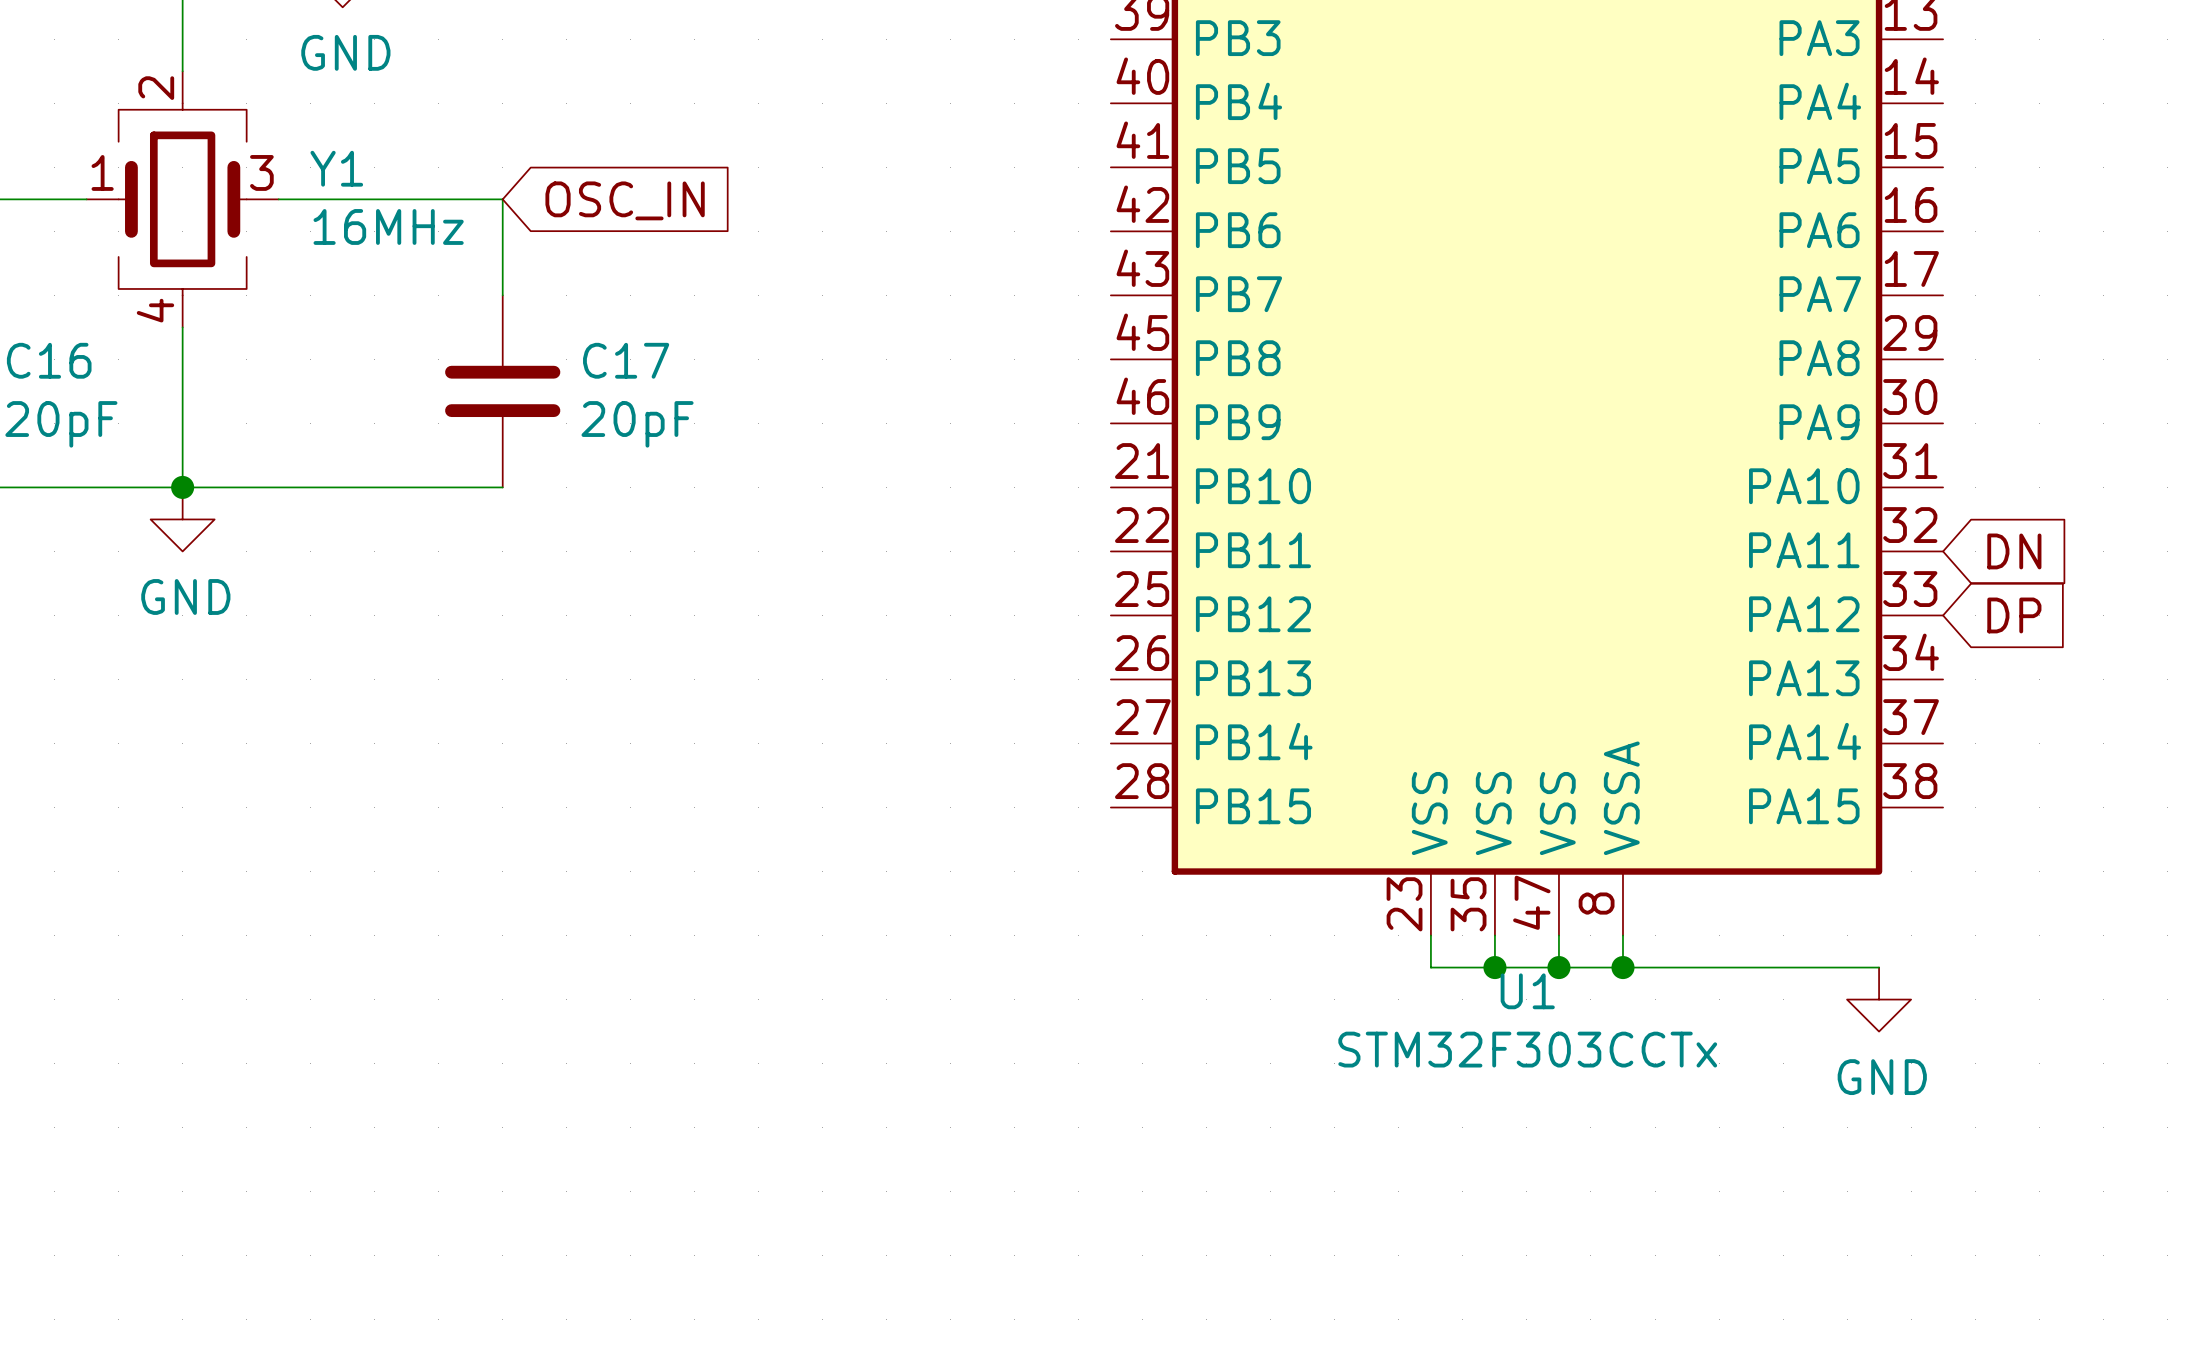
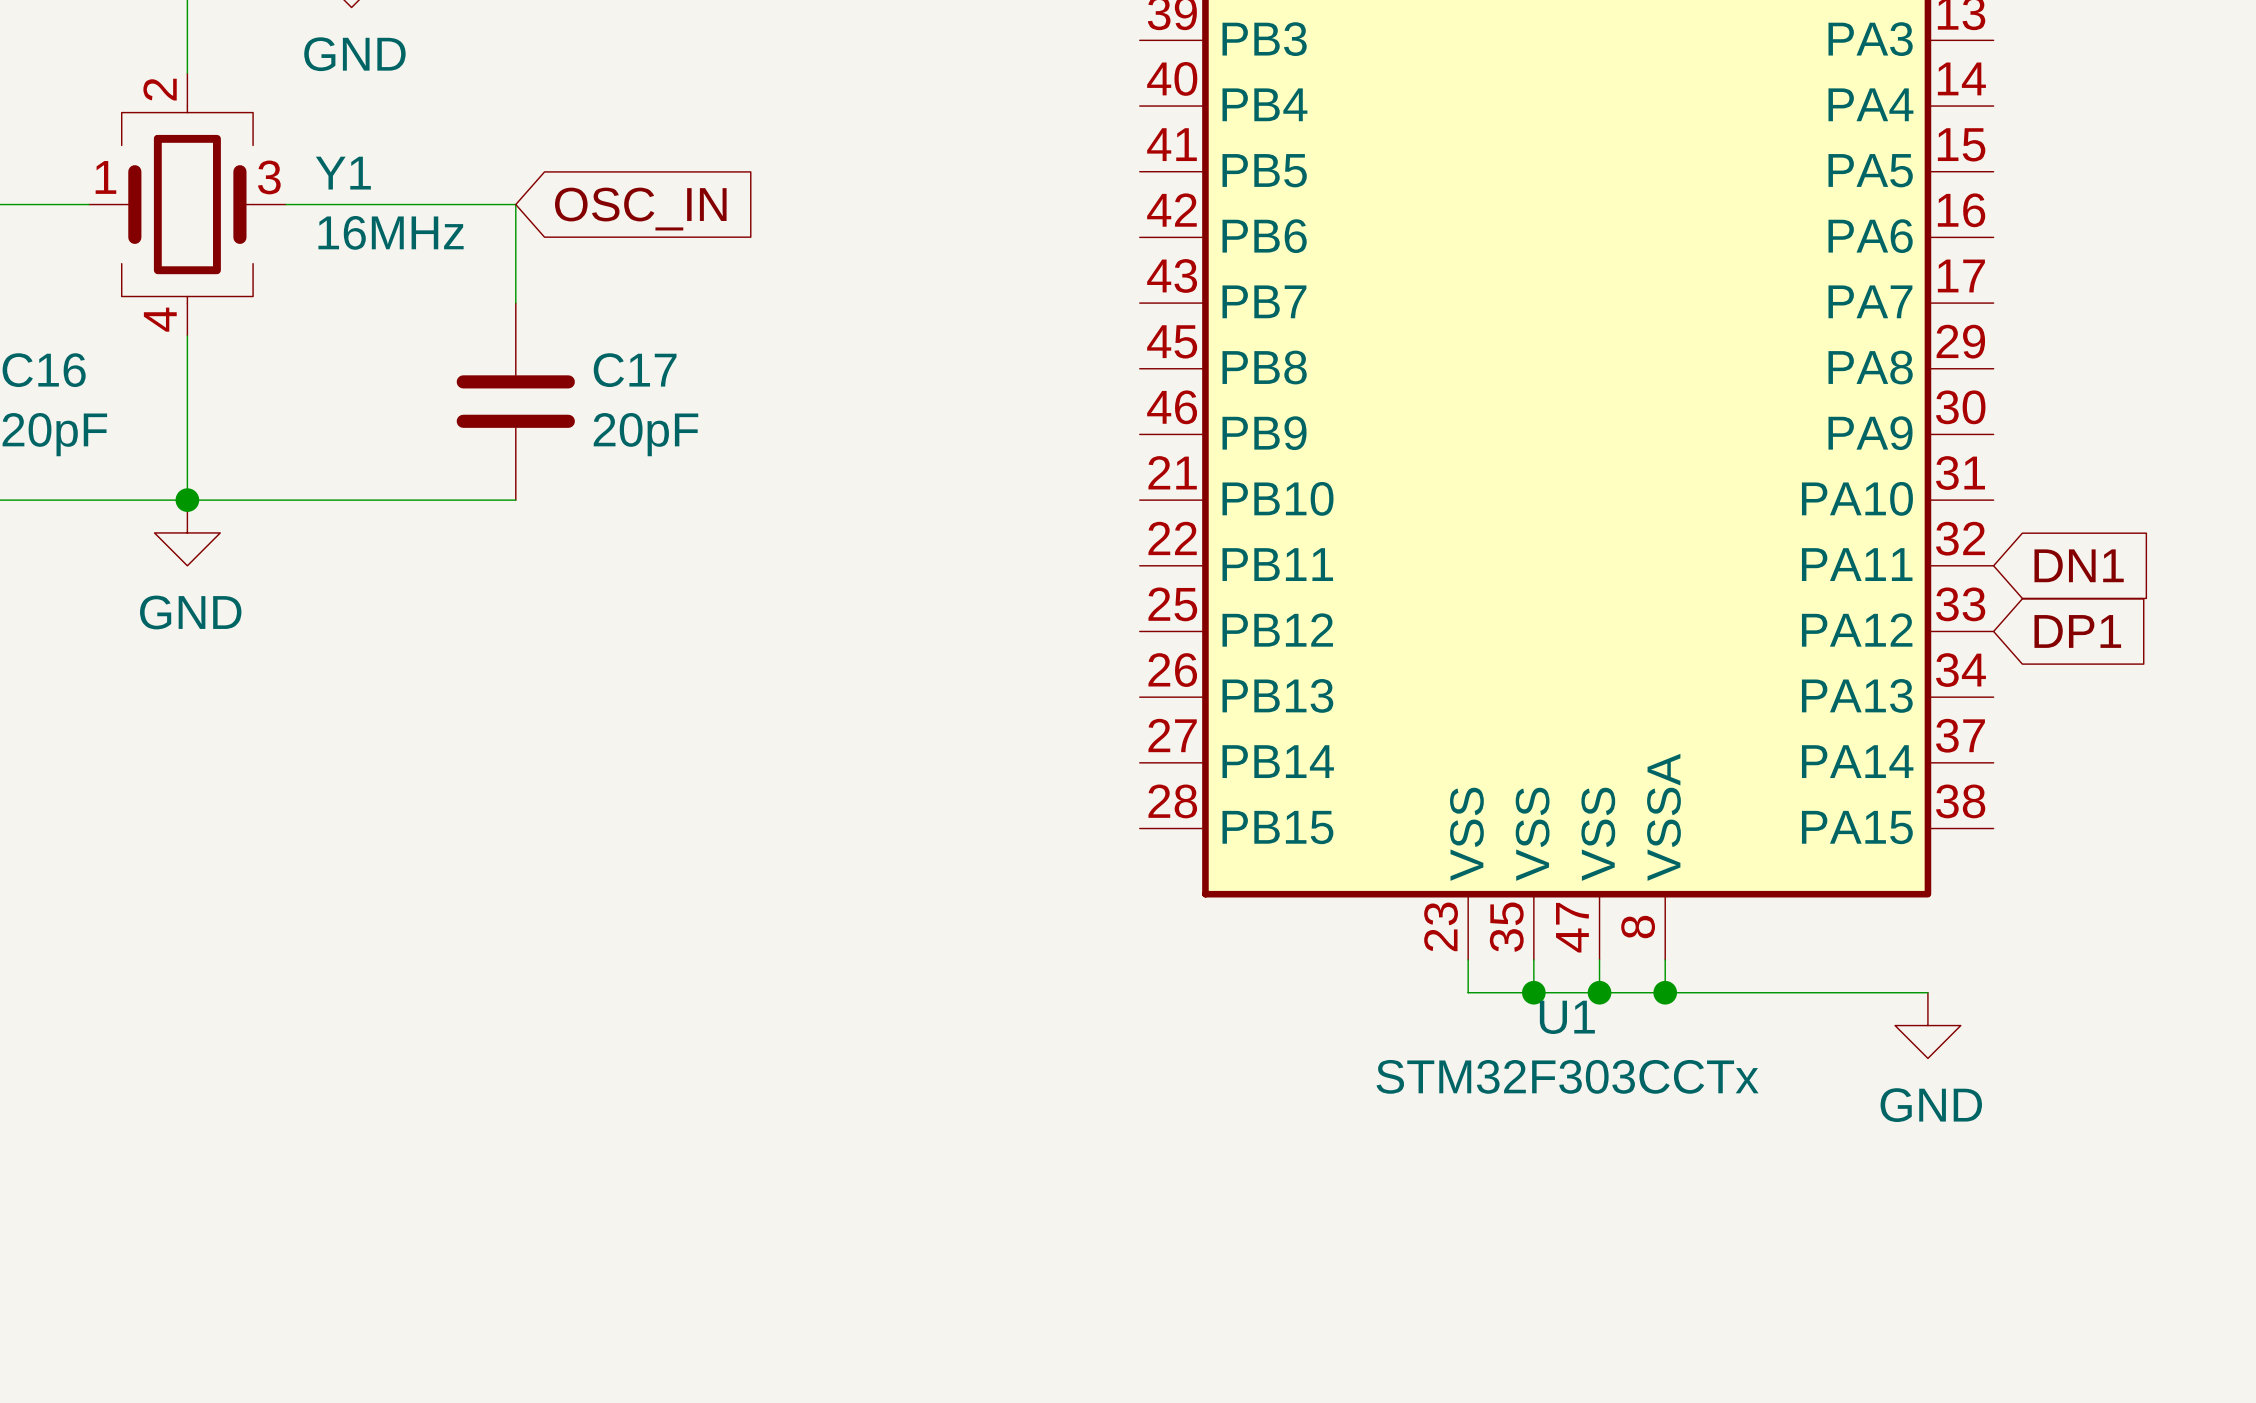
global label: DN (2014, 551) -> DN1 (2079, 565)
global label: DP (2014, 615) -> DP1 (2077, 631)

